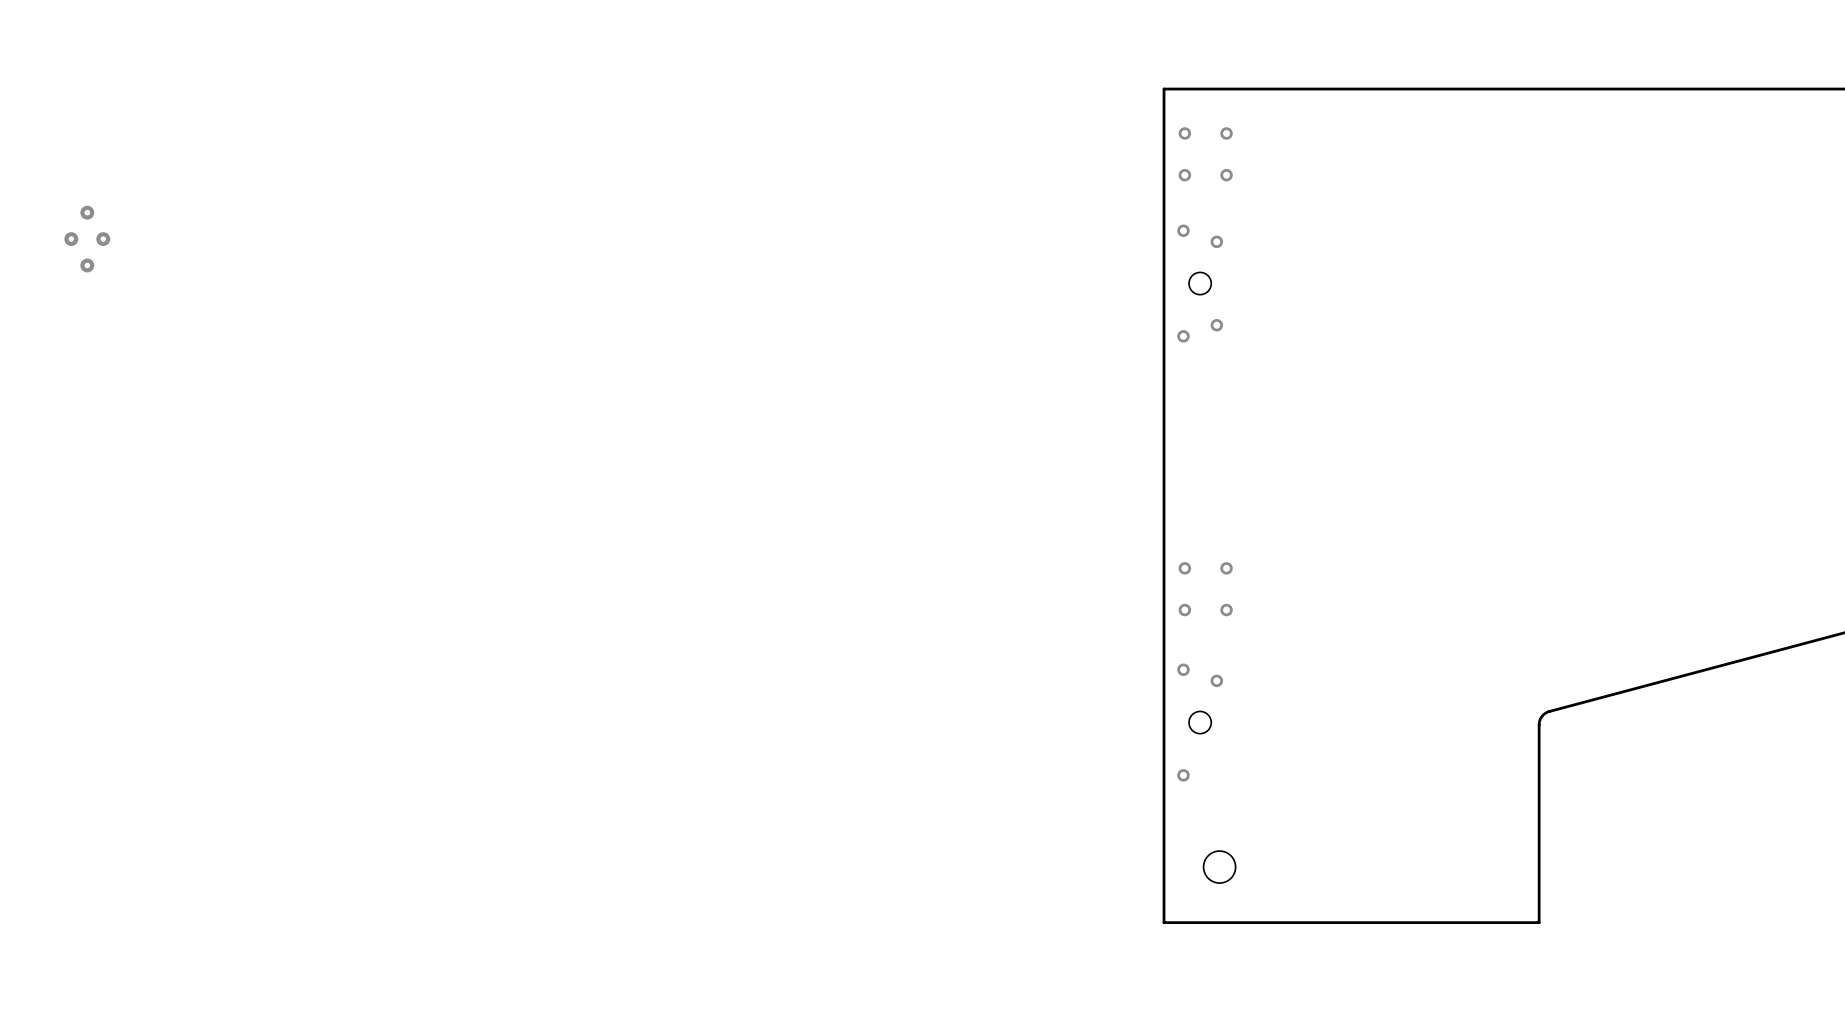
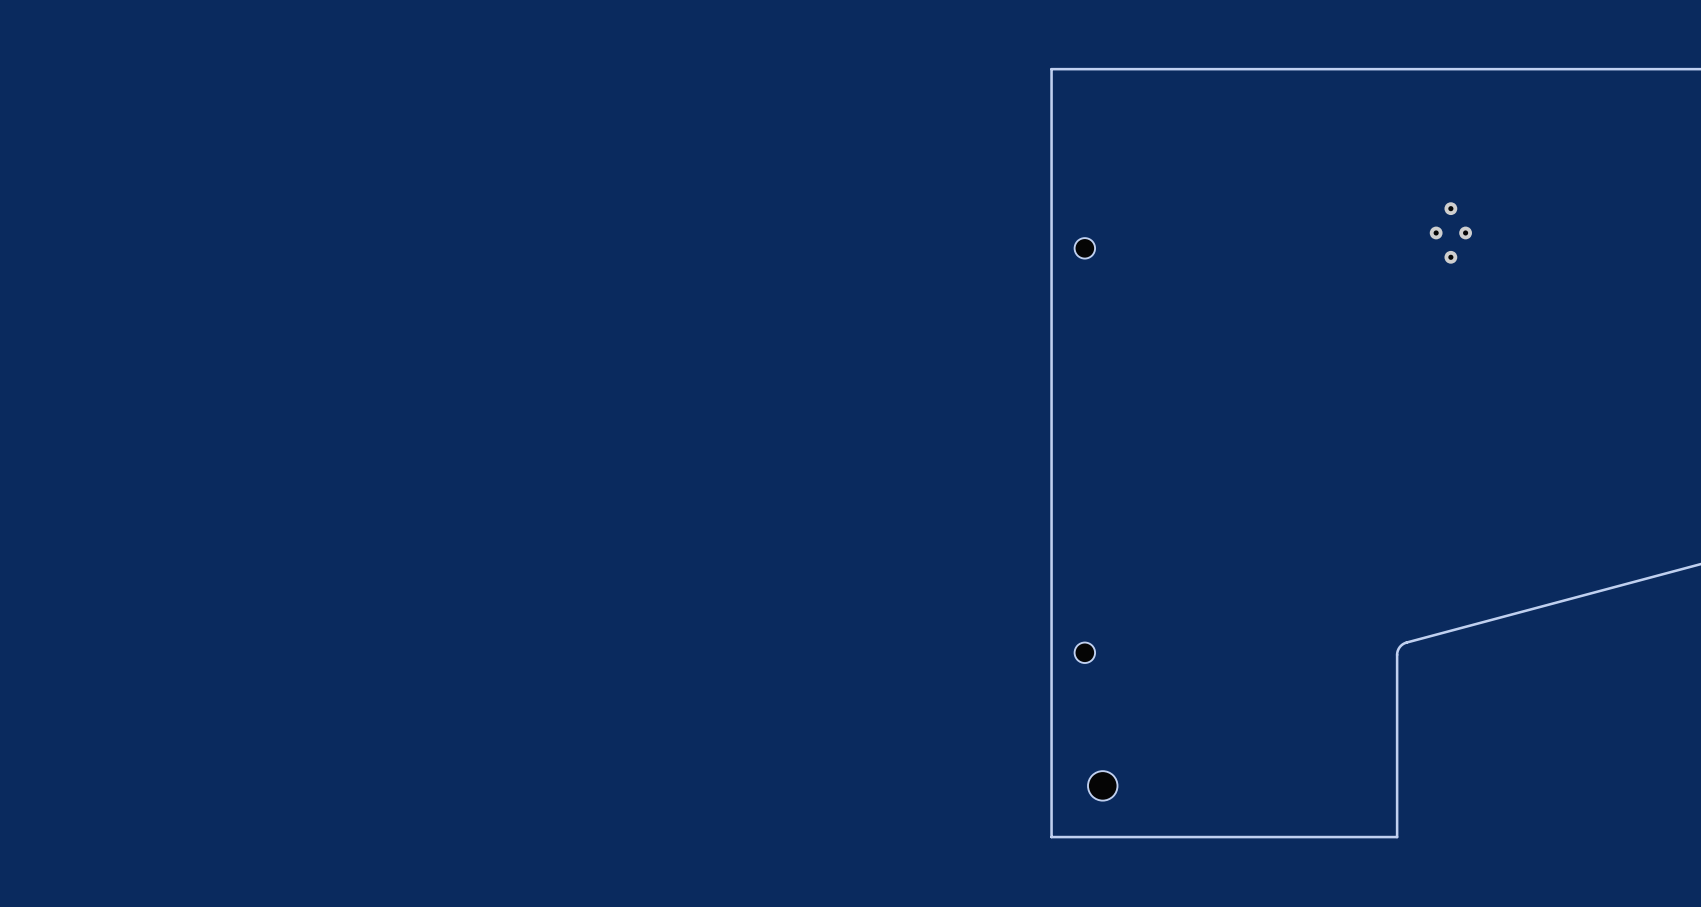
via: (1184, 133) -> none
via: (1226, 133) -> none
via: (1184, 175) -> none
via: (1226, 175) -> none
via: (1183, 230) -> none
part: (87, 239) -> none
via: (1216, 241) -> none
part: none -> (1450, 232)
via: (1216, 325) -> none
via: (1183, 336) -> none
via: (1184, 568) -> none
via: (1226, 568) -> none
via: (1184, 610) -> none
via: (1226, 610) -> none
via: (1183, 669) -> none
via: (1216, 680) -> none
via: (1183, 775) -> none

